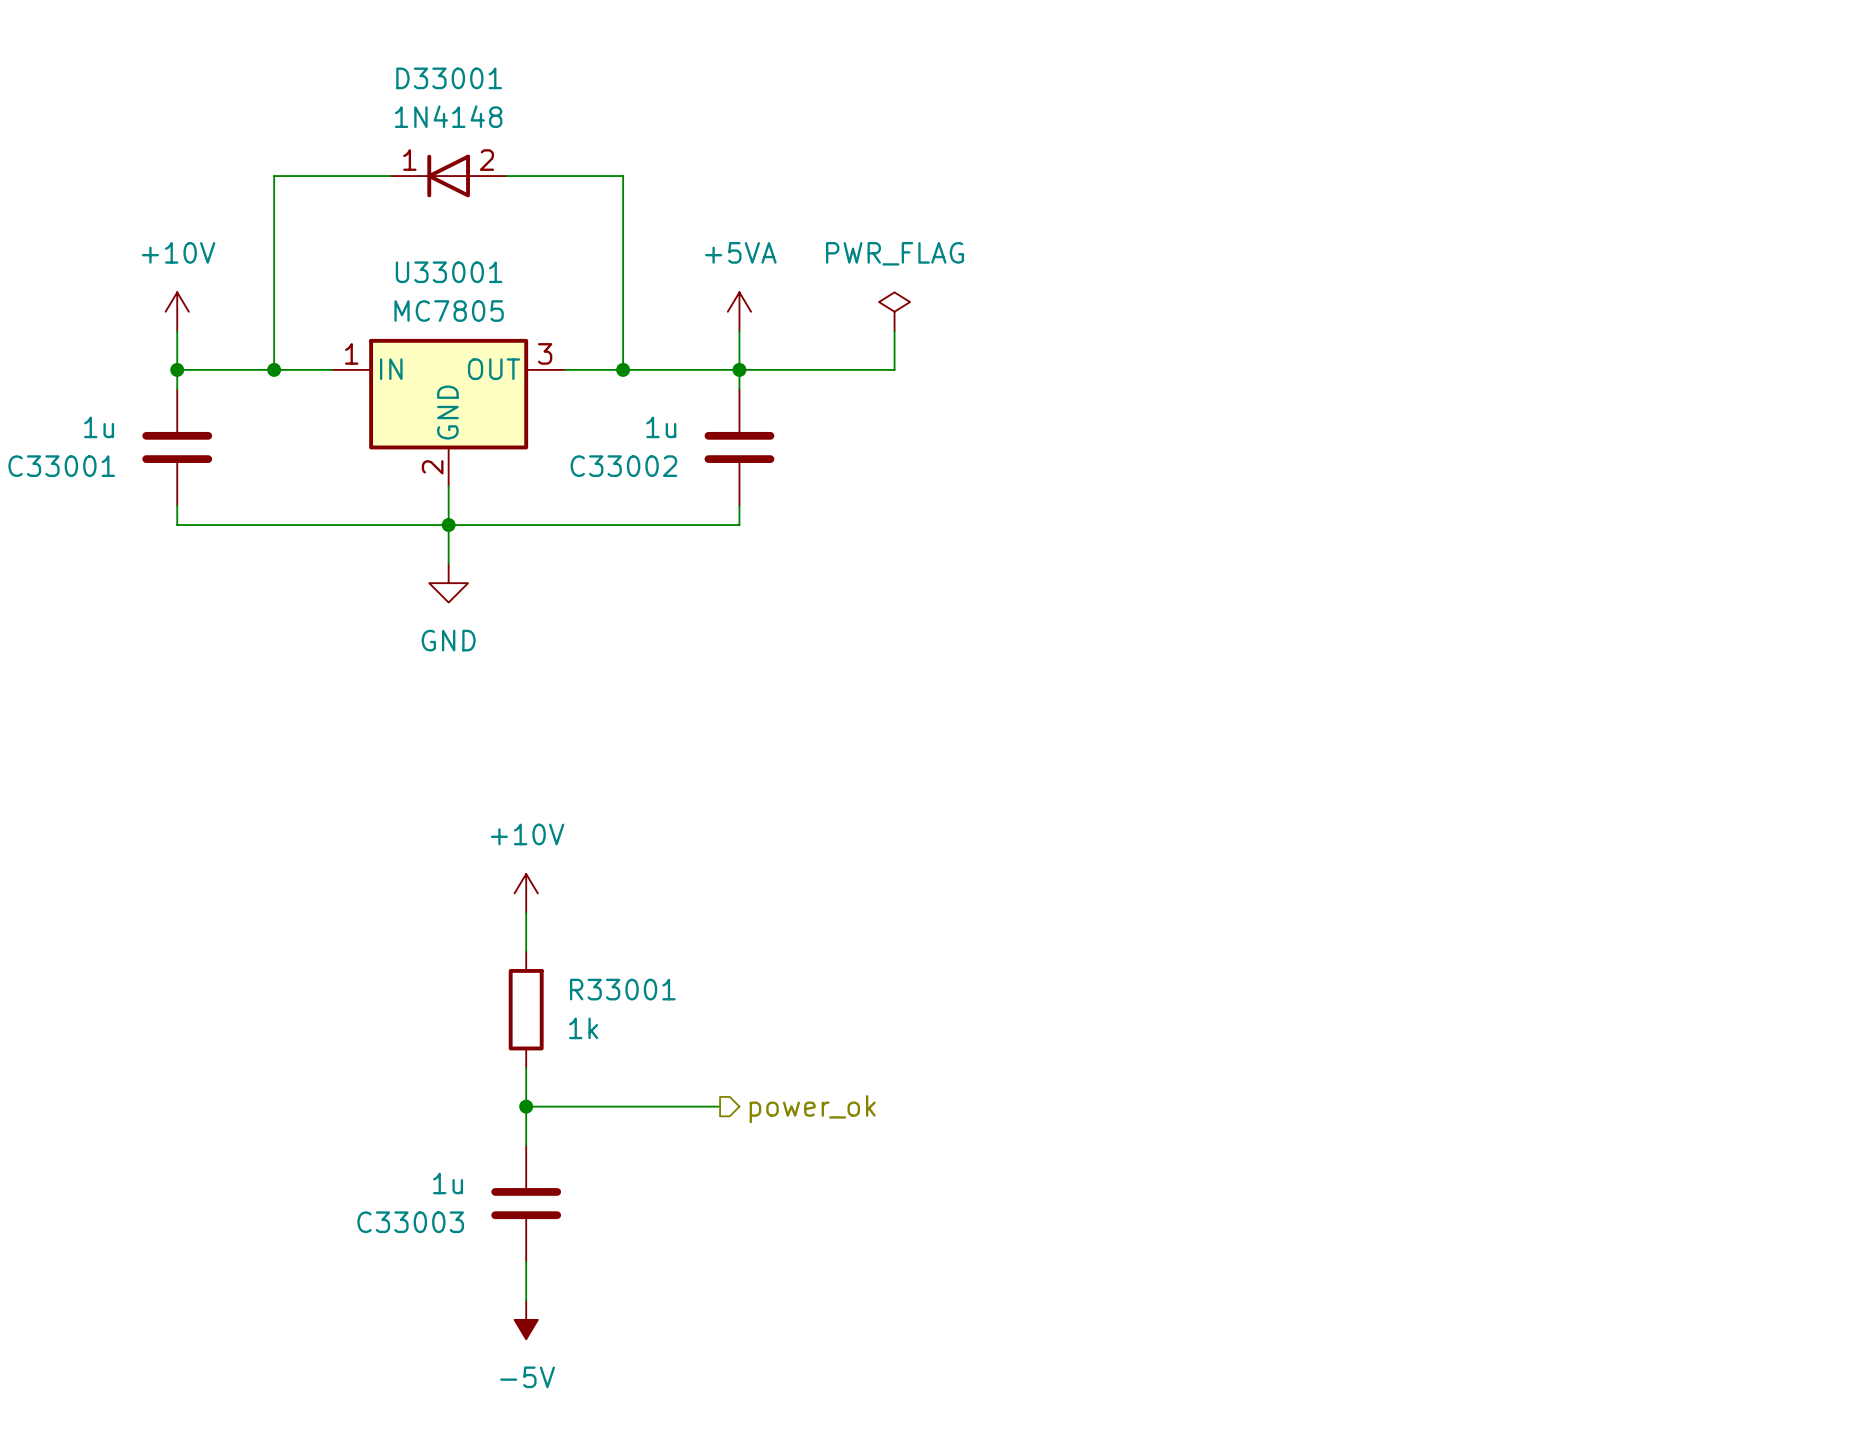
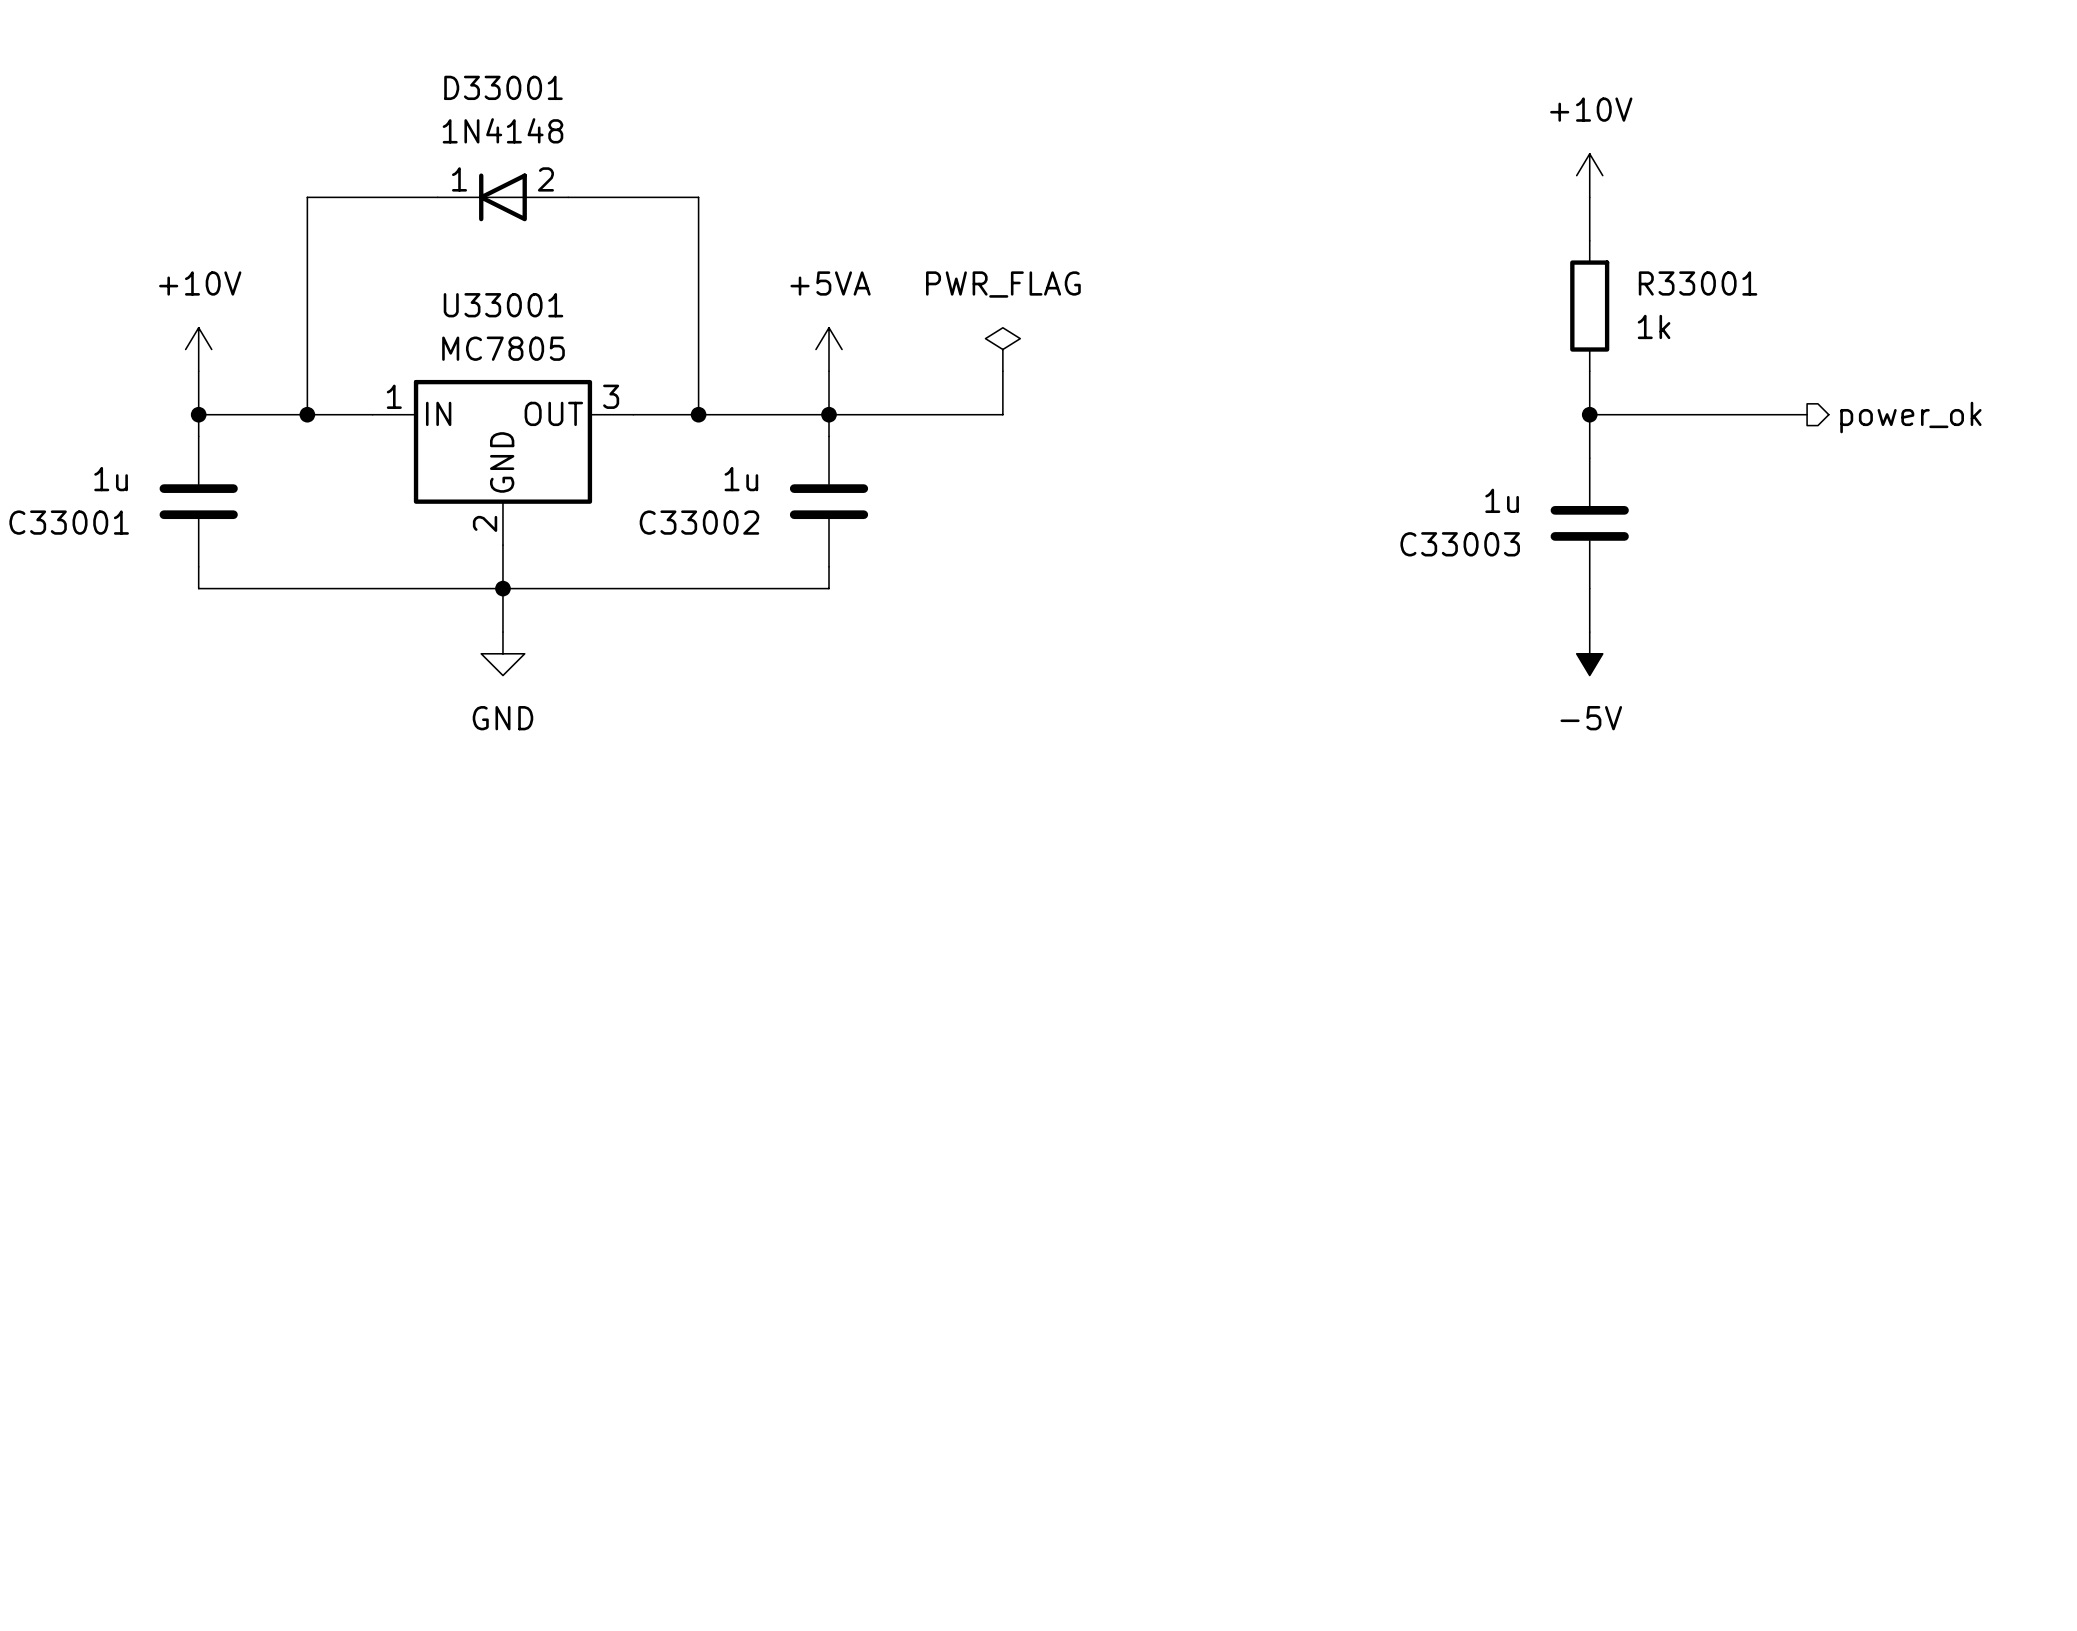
power symbol: none -> +10V (1589, 175)
wire: none -> (1589, 197) (1589, 240)
wire: none -> (1589, 371) (1589, 458)
wire: none -> (1589, 414) (1807, 414)
junction: none -> (1589, 414)
hierarchical label: none -> power_ok (1910, 417)
wire: none -> (1589, 588) (1589, 632)
power symbol: none -> -5V (1589, 653)
power symbol: +10V (526, 893) -> none
wire: (526, 912) (526, 951) -> none
R33001 position: (526, 1009) -> (1589, 306)
wire: (526, 1067) (526, 1145) -> none
wire: (526, 1106) (720, 1106) -> none
junction: (526, 1106) -> none
hierarchical label: power_ok (812, 1109) -> none
C33003 position: (526, 1203) -> (1589, 523)
wire: (526, 1261) (526, 1300) -> none
power symbol: -5V (526, 1319) -> none

